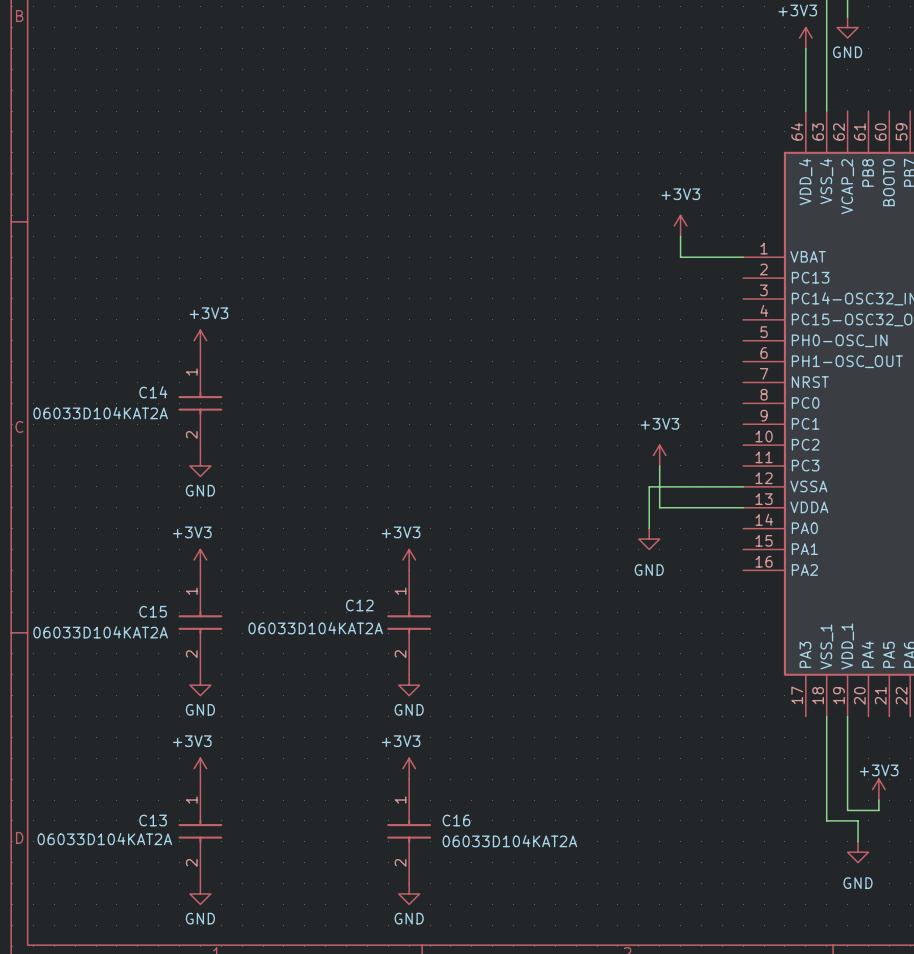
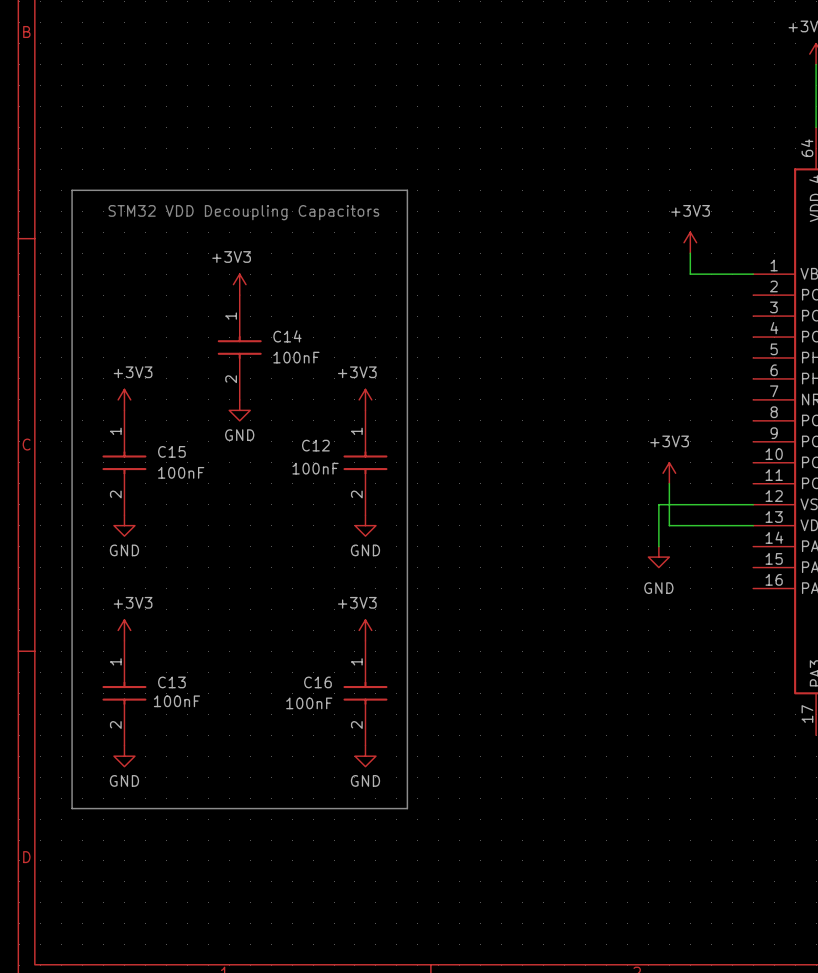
line: none -> (72, 190) (407, 190) (407, 808) (72, 808) (72, 190)
text: none -> STM32 VDD Decoupling Capacitors (243, 212)
power symbol: none -> +3V3 (239, 284)
power symbol: +3V3 (200, 340) -> none
power symbol: none -> +3V3 (124, 399)
power symbol: none -> +3V3 (365, 399)
C14 name position: C14 (153, 392) -> C14 (287, 336)
power symbol: none -> GND (239, 410)
C14 position: (200, 403) -> (239, 347)
C14 value: 06033D104KAT2A (100, 413) -> 100nF (296, 357)
power symbol: GND (200, 465) -> none
power symbol: none -> GND (124, 525)
power symbol: none -> GND (365, 525)
power symbol: +3V3 (200, 559) -> none
power symbol position: +3V3 (409, 559) -> +3V3 (365, 630)
C15 name position: C15 (153, 611) -> C15 (171, 451)
power symbol: none -> +3V3 (124, 630)
C15 position: (200, 622) -> (124, 462)
C12 position: (409, 622) -> (365, 462)
C12 value: 06033D104KAT2A (315, 628) -> 100nF (315, 468)
C15 value: 06033D104KAT2A (100, 632) -> 100nF (181, 472)
power symbol: GND (200, 685) -> none
power symbol position: GND (409, 685) -> GND (365, 756)
power symbol: none -> GND (124, 756)
power symbol: +3V3 (200, 768) -> none
power symbol: +3V3 (409, 768) -> none
C13 name position: C13 (153, 820) -> C13 (171, 682)
C16 name position: C16 (456, 820) -> C16 (317, 682)
C13 position: (200, 831) -> (124, 693)
C16 position: (409, 831) -> (365, 693)
C13 value: 06033D104KAT2A (104, 839) -> 100nF (176, 701)
C16 value: 06033D104KAT2A (509, 841) -> 100nF (309, 703)
power symbol: GND (200, 893) -> none
power symbol: GND (409, 893) -> none

